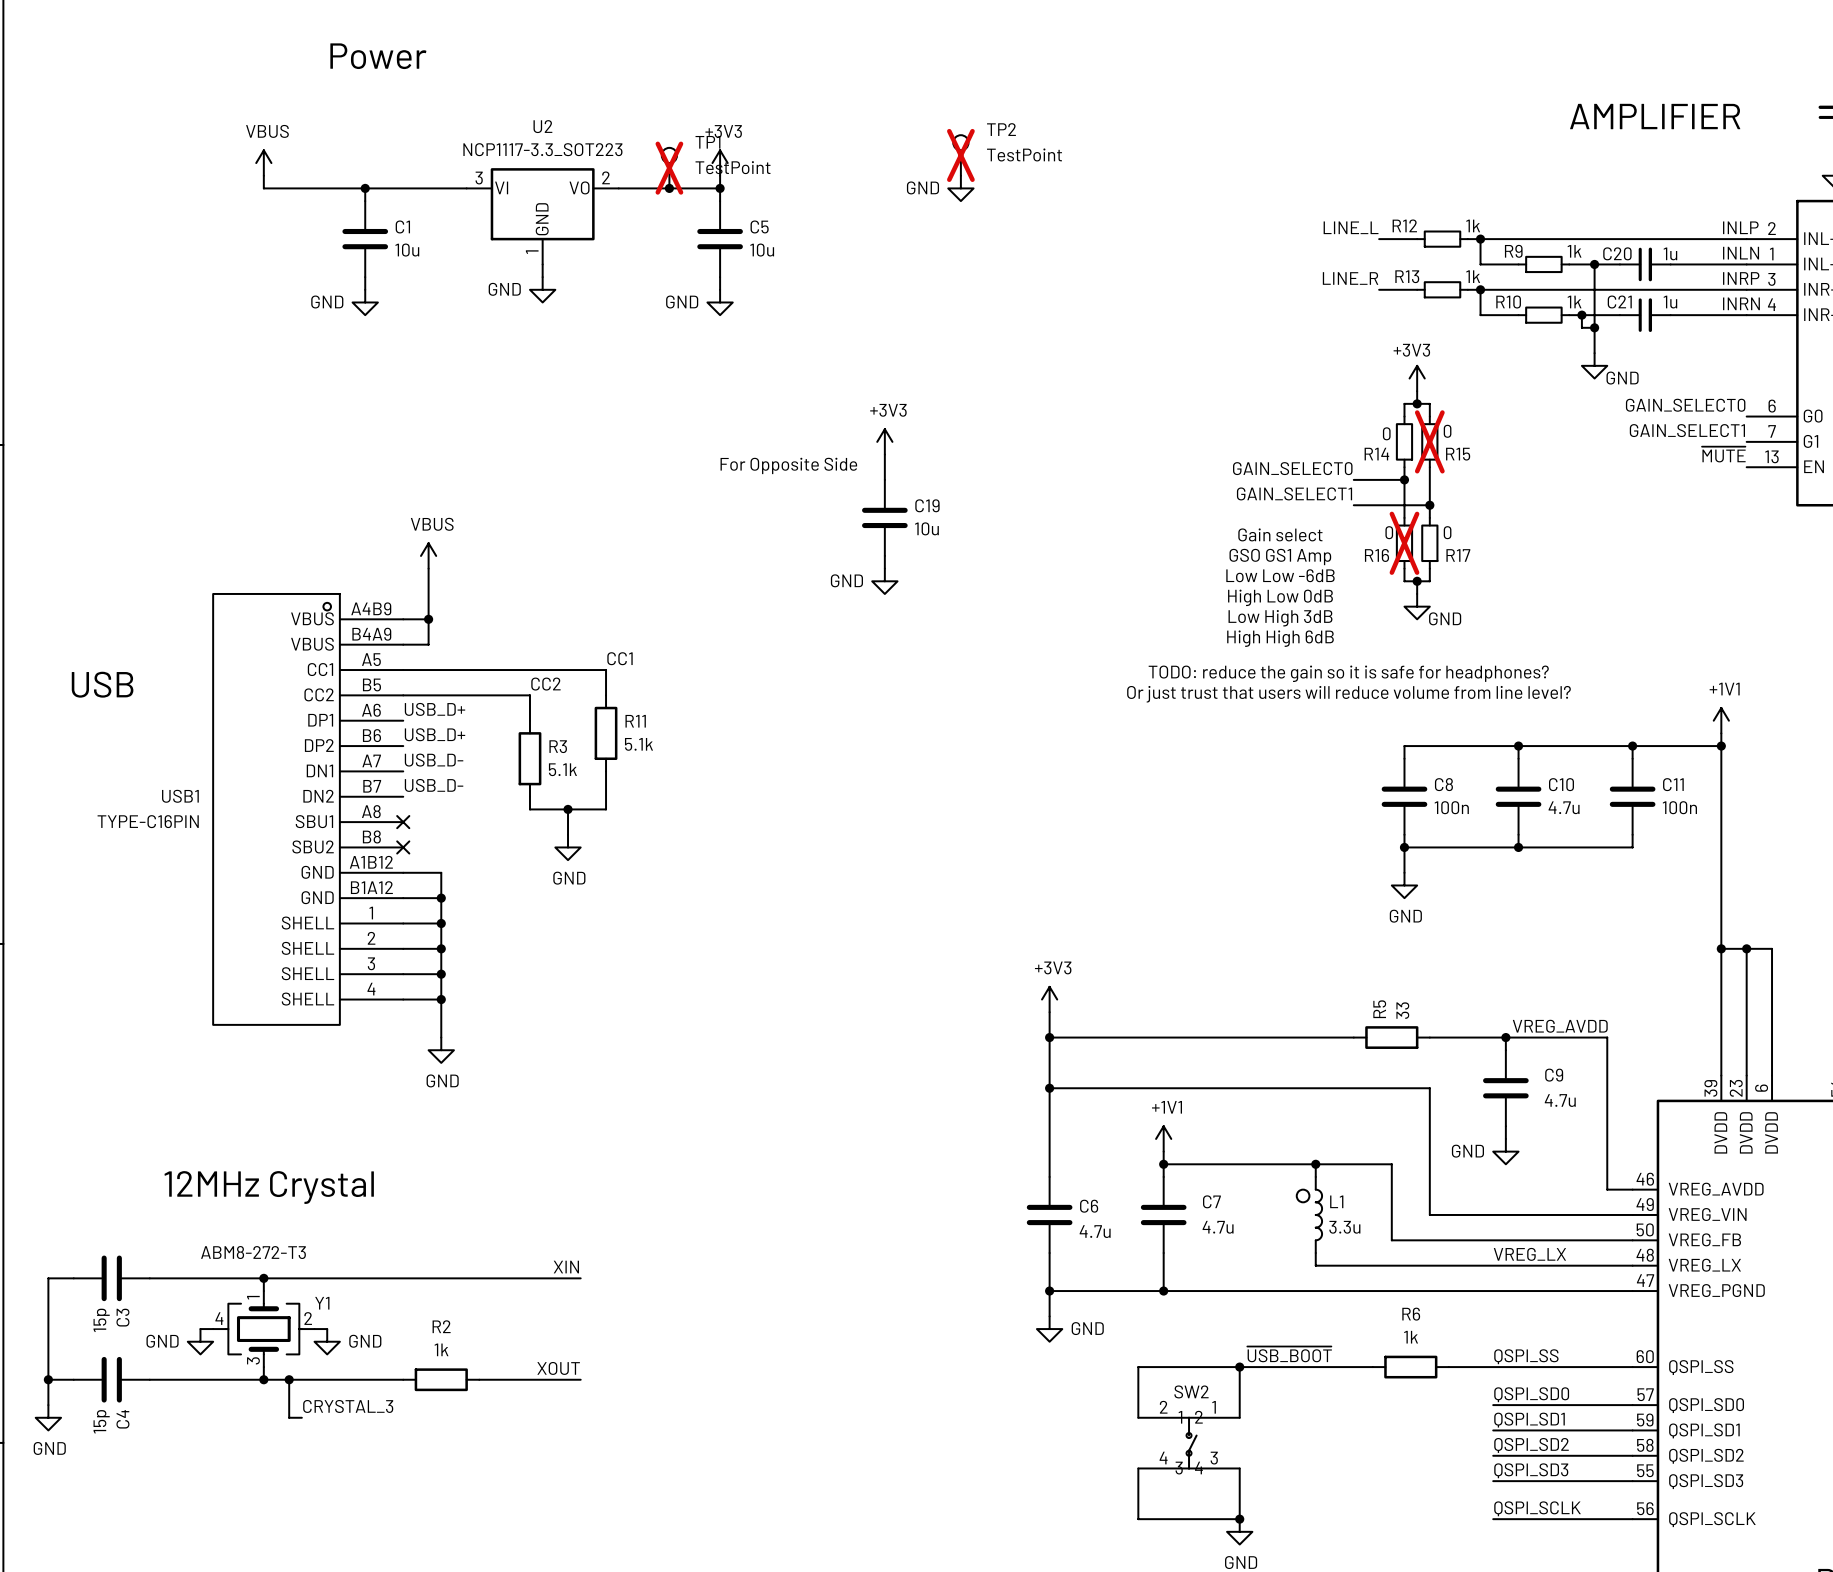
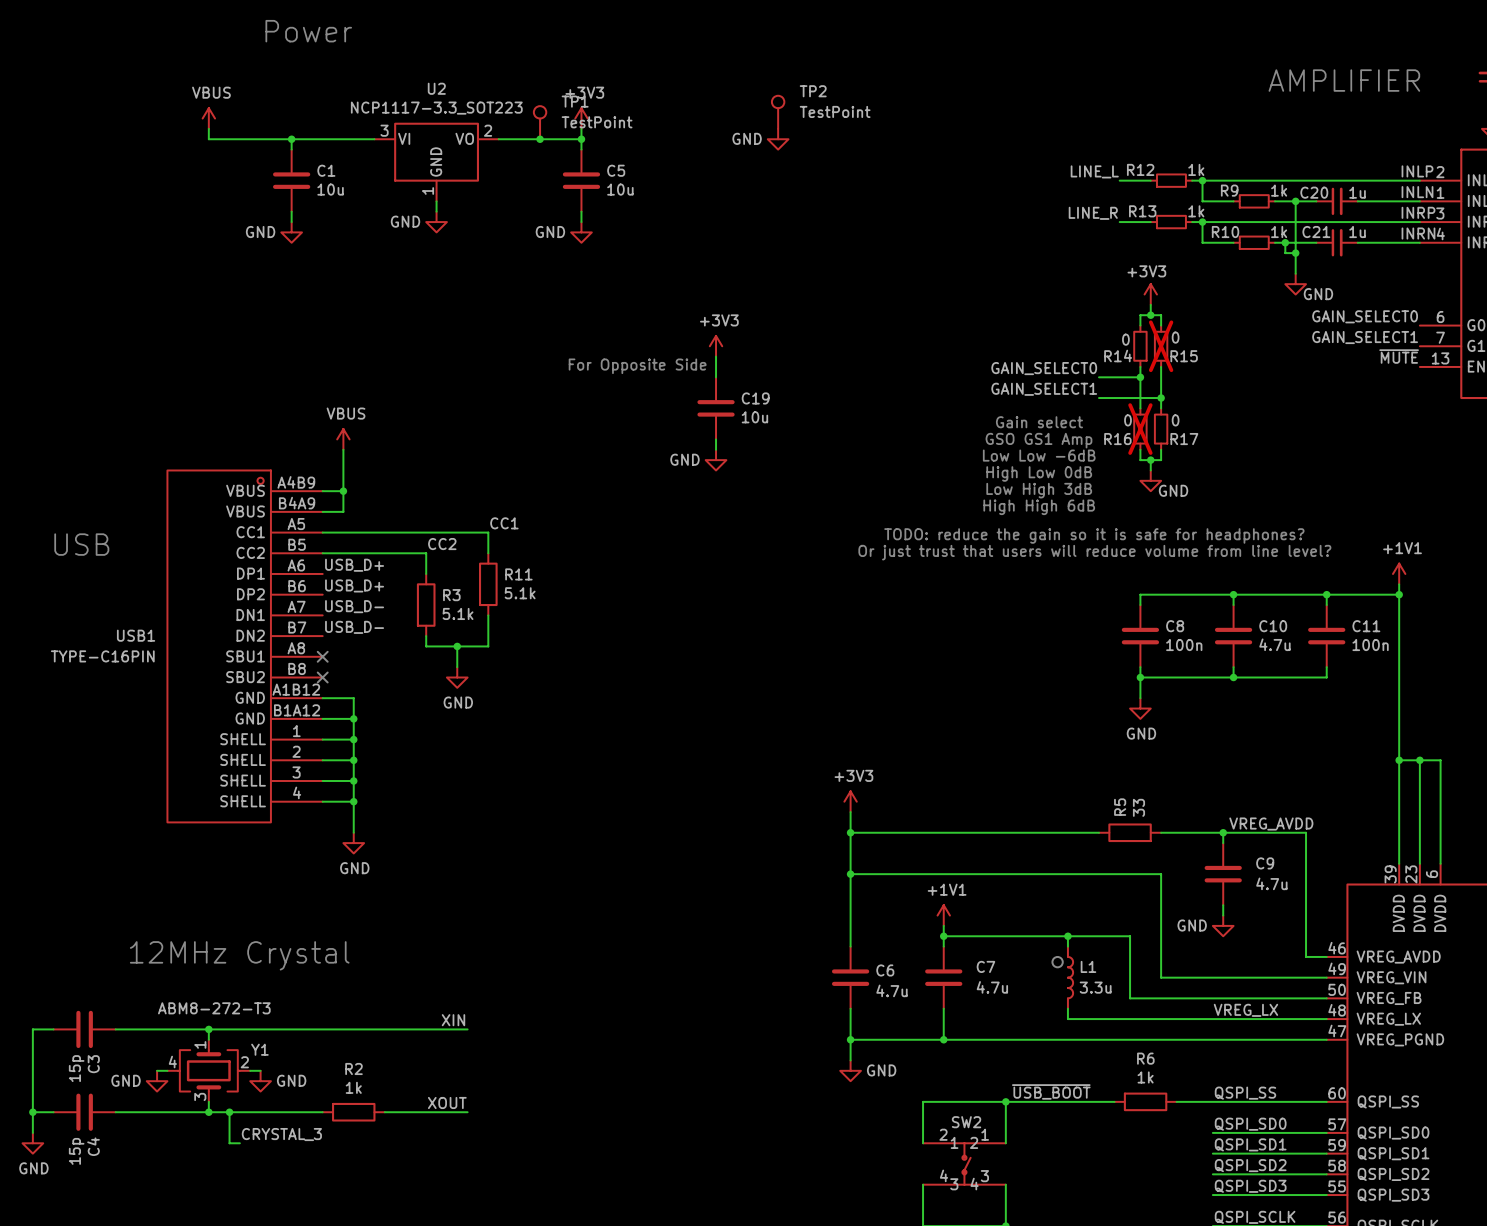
TP2 do-not-place cross: (960, 155) -> none
TP1 do-not-place cross: (669, 168) -> none

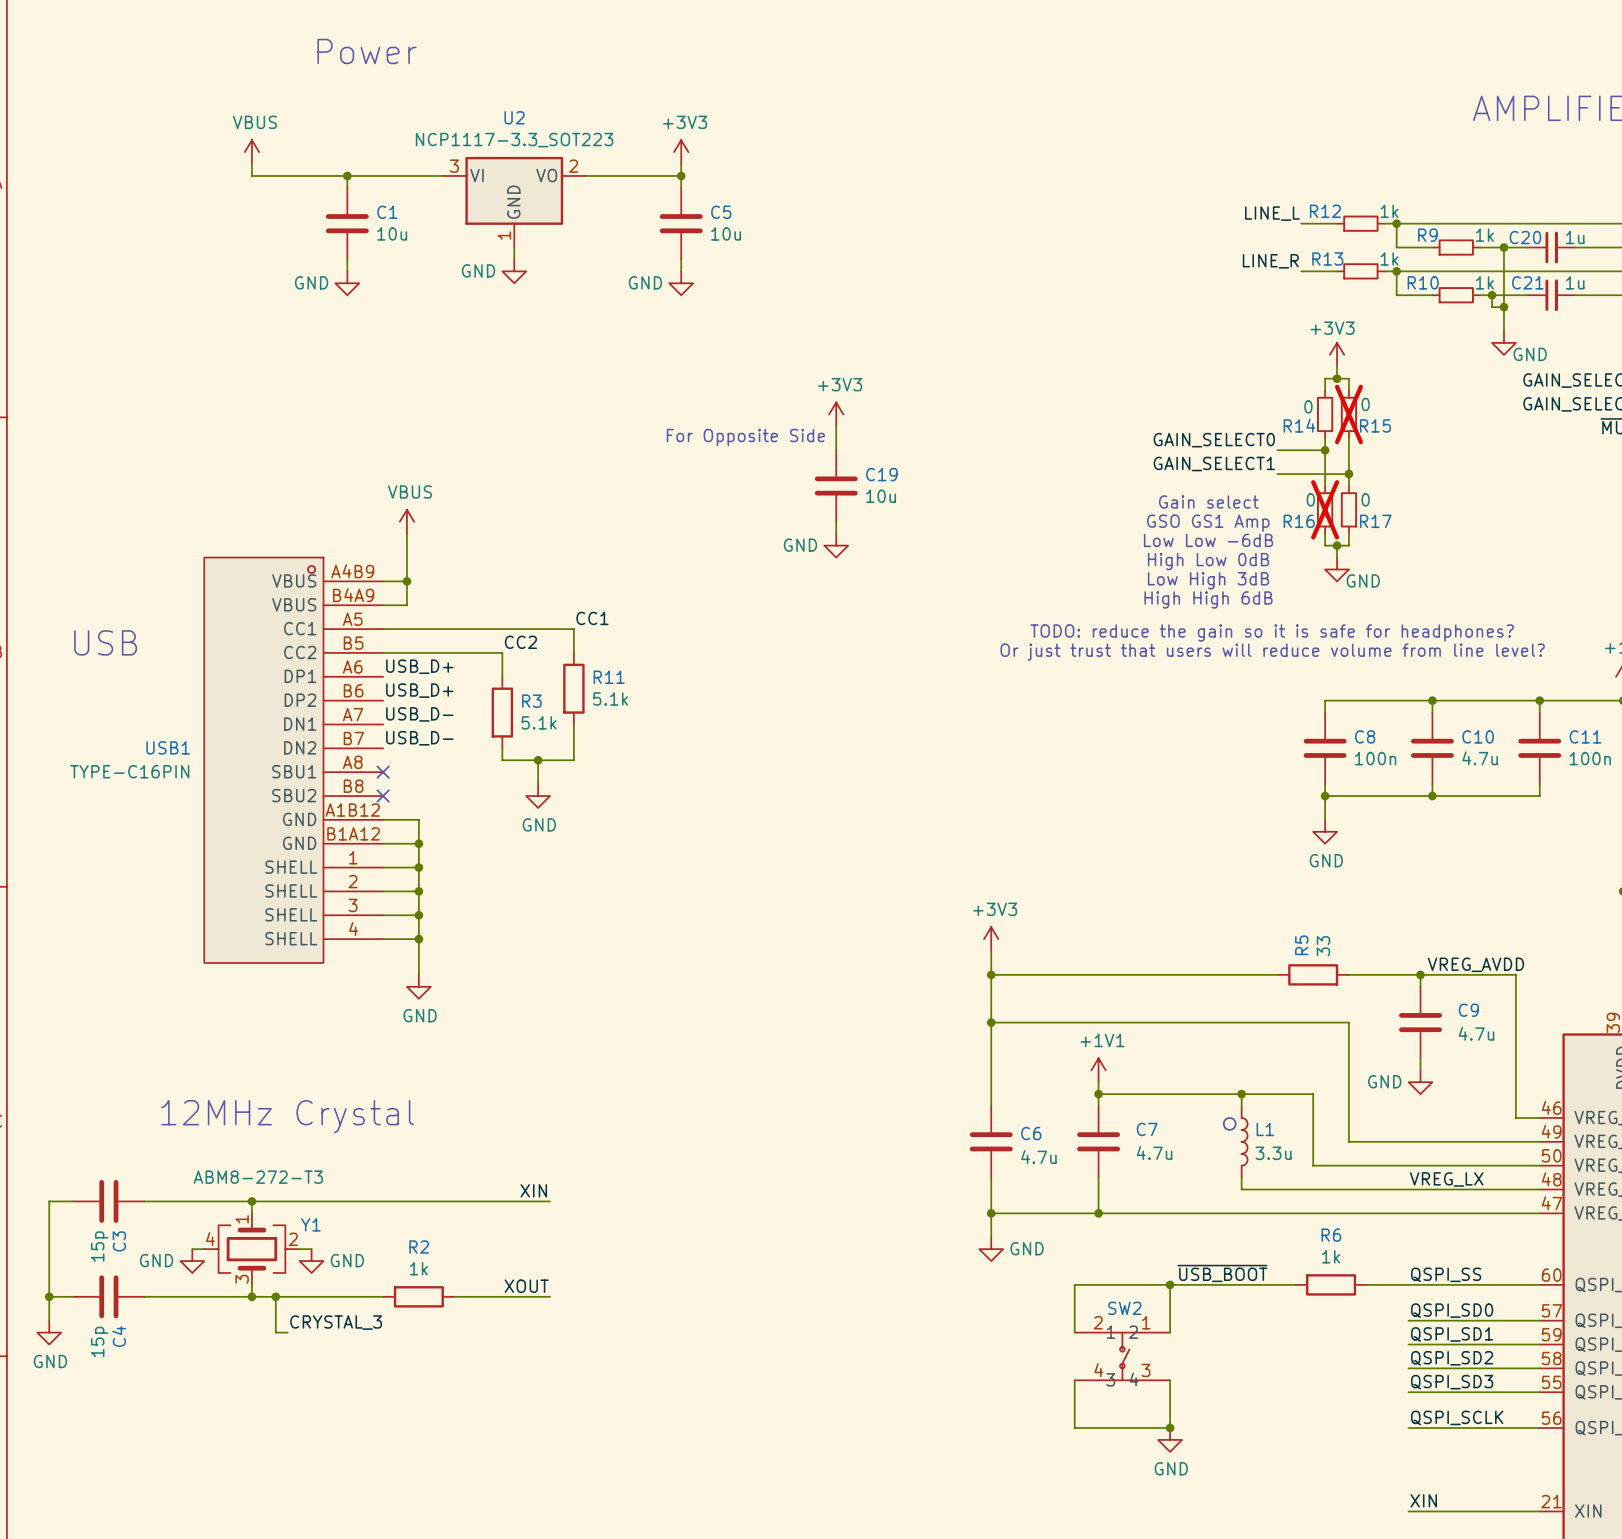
TP2: TestPoint (778, 112) -> none
TP1: TestPoint (540, 122) -> none
junction: (540, 139) -> none
power symbol: GND (778, 139) -> none

